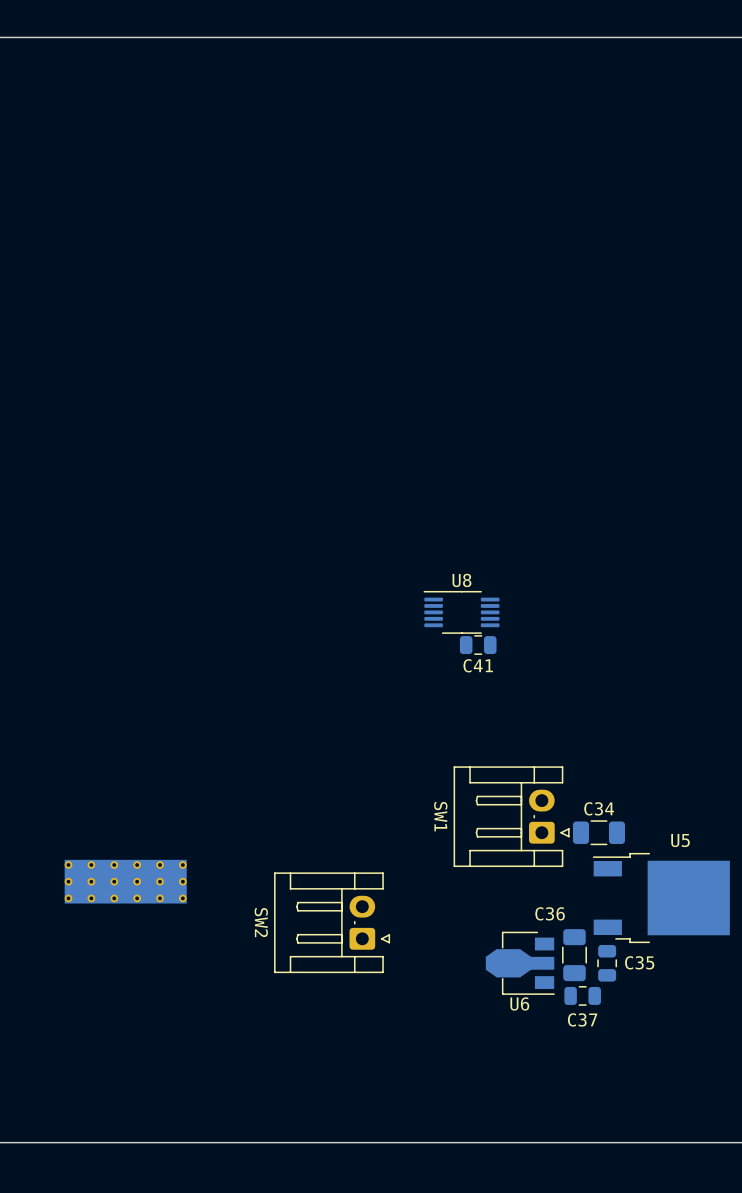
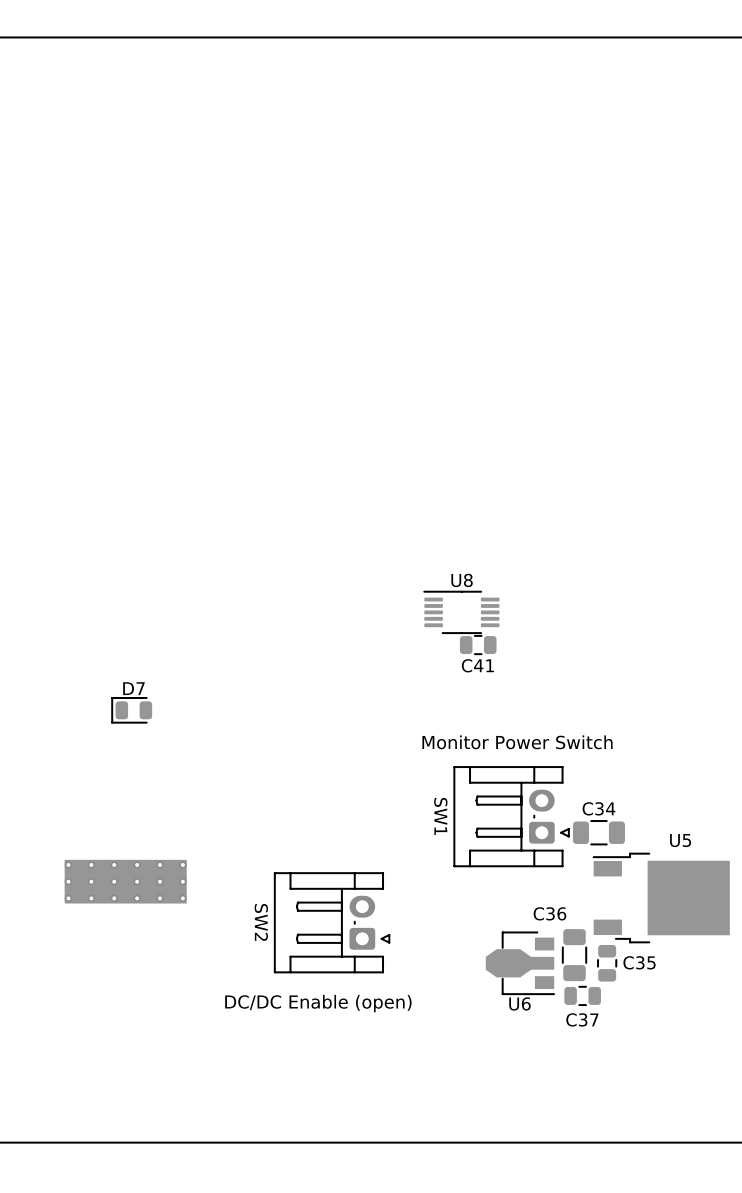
D7: none -> (131, 710)
text: none -> Monitor Power Switch (517, 742)
text: none -> DC/DC Enable (open) (318, 1003)

